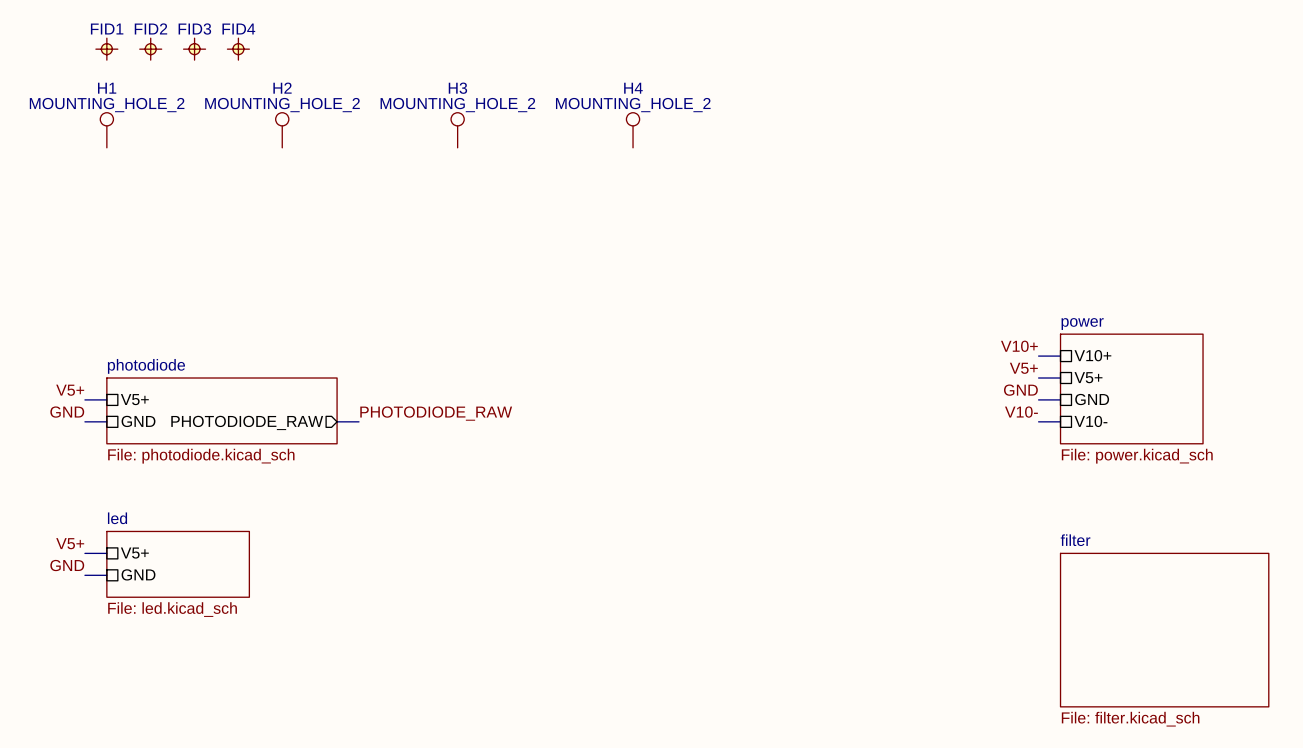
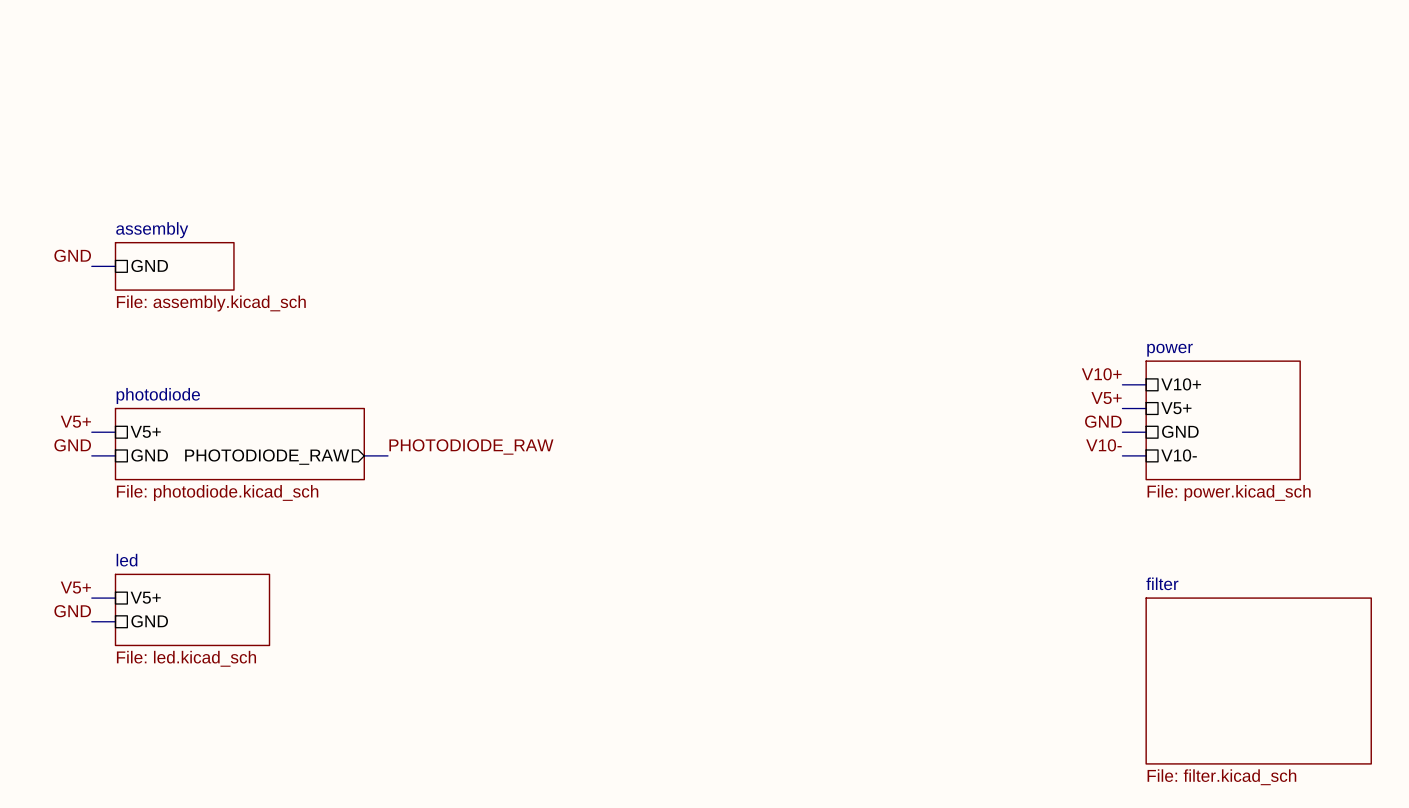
FID1: (106, 49) -> none
FID2: (150, 49) -> none
FID3: (194, 49) -> none
FID4: (238, 49) -> none
H1: MOUNTING_HOLE_2 (106, 130) -> none
H2: MOUNTING_HOLE_2 (282, 130) -> none
H3: MOUNTING_HOLE_2 (457, 130) -> none
H4: MOUNTING_HOLE_2 (633, 130) -> none
label: none -> GND (72, 255)
wire: none -> (91, 266) (115, 266)
sheet pin: none -> GND (149, 265)
sheet assembly: none -> File: assembly.kicad_sch (174, 266)

